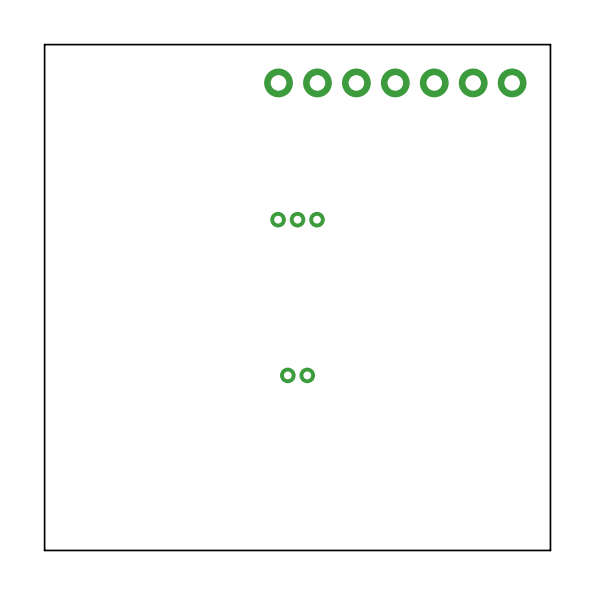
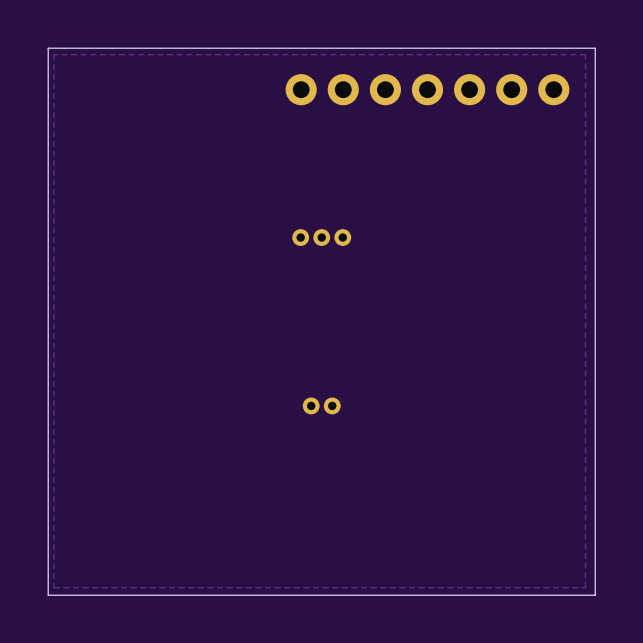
zone outline: none -> (585, 54) (53, 54) (53, 587) (585, 587) (585, 54)

